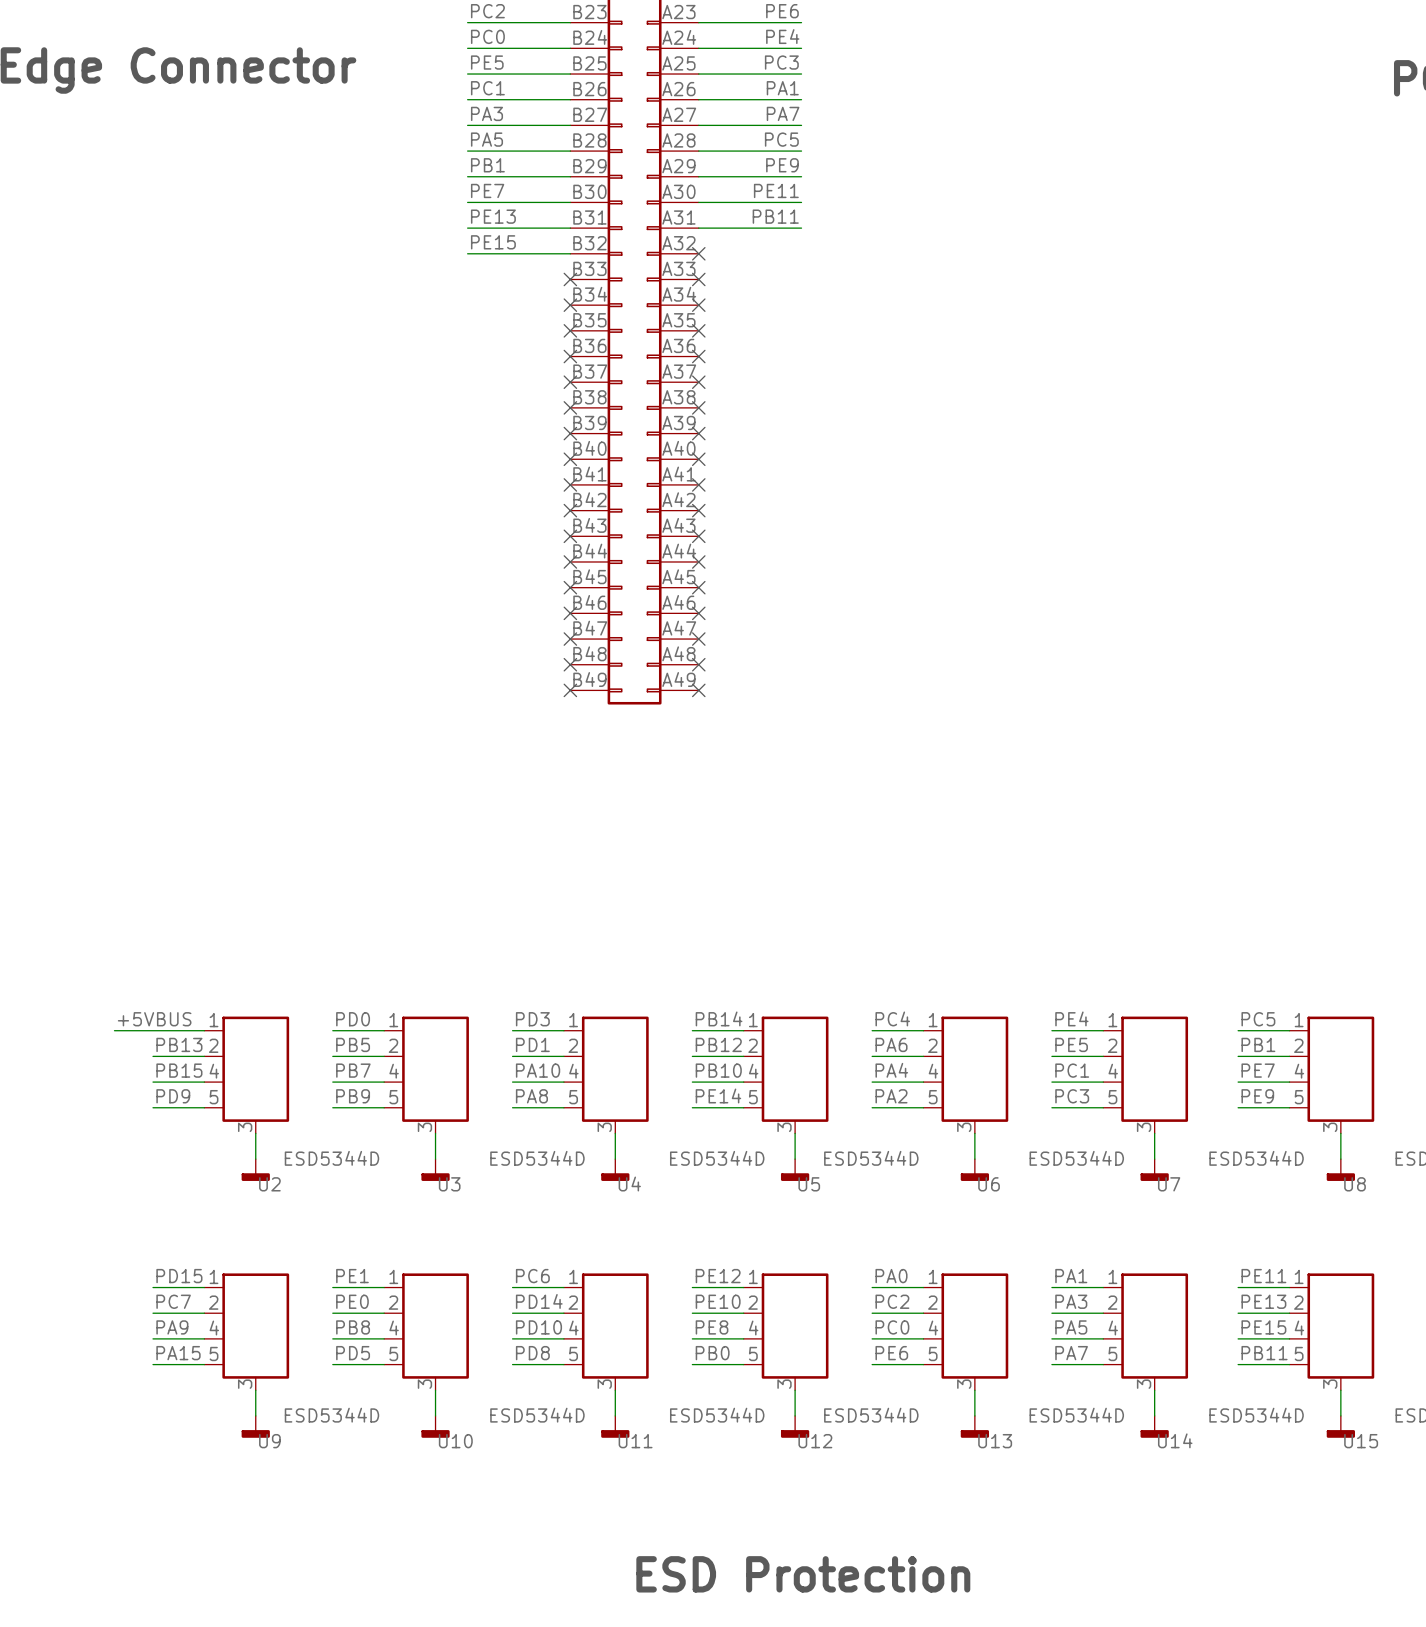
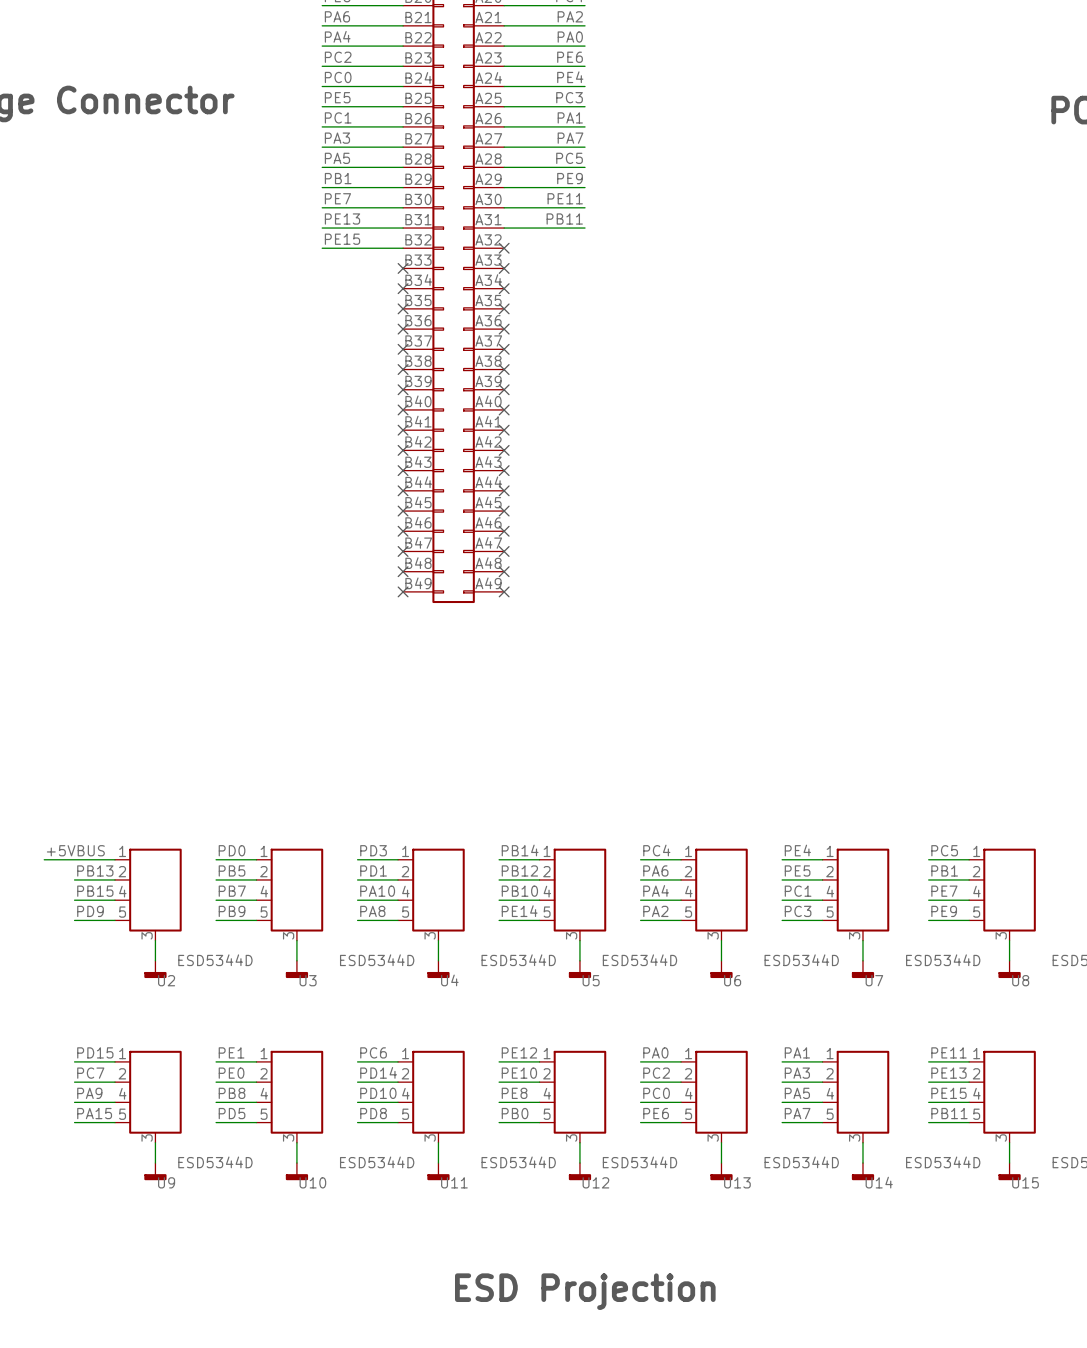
text: ESD Protection (803, 1574) -> ESD Projection (585, 1291)

